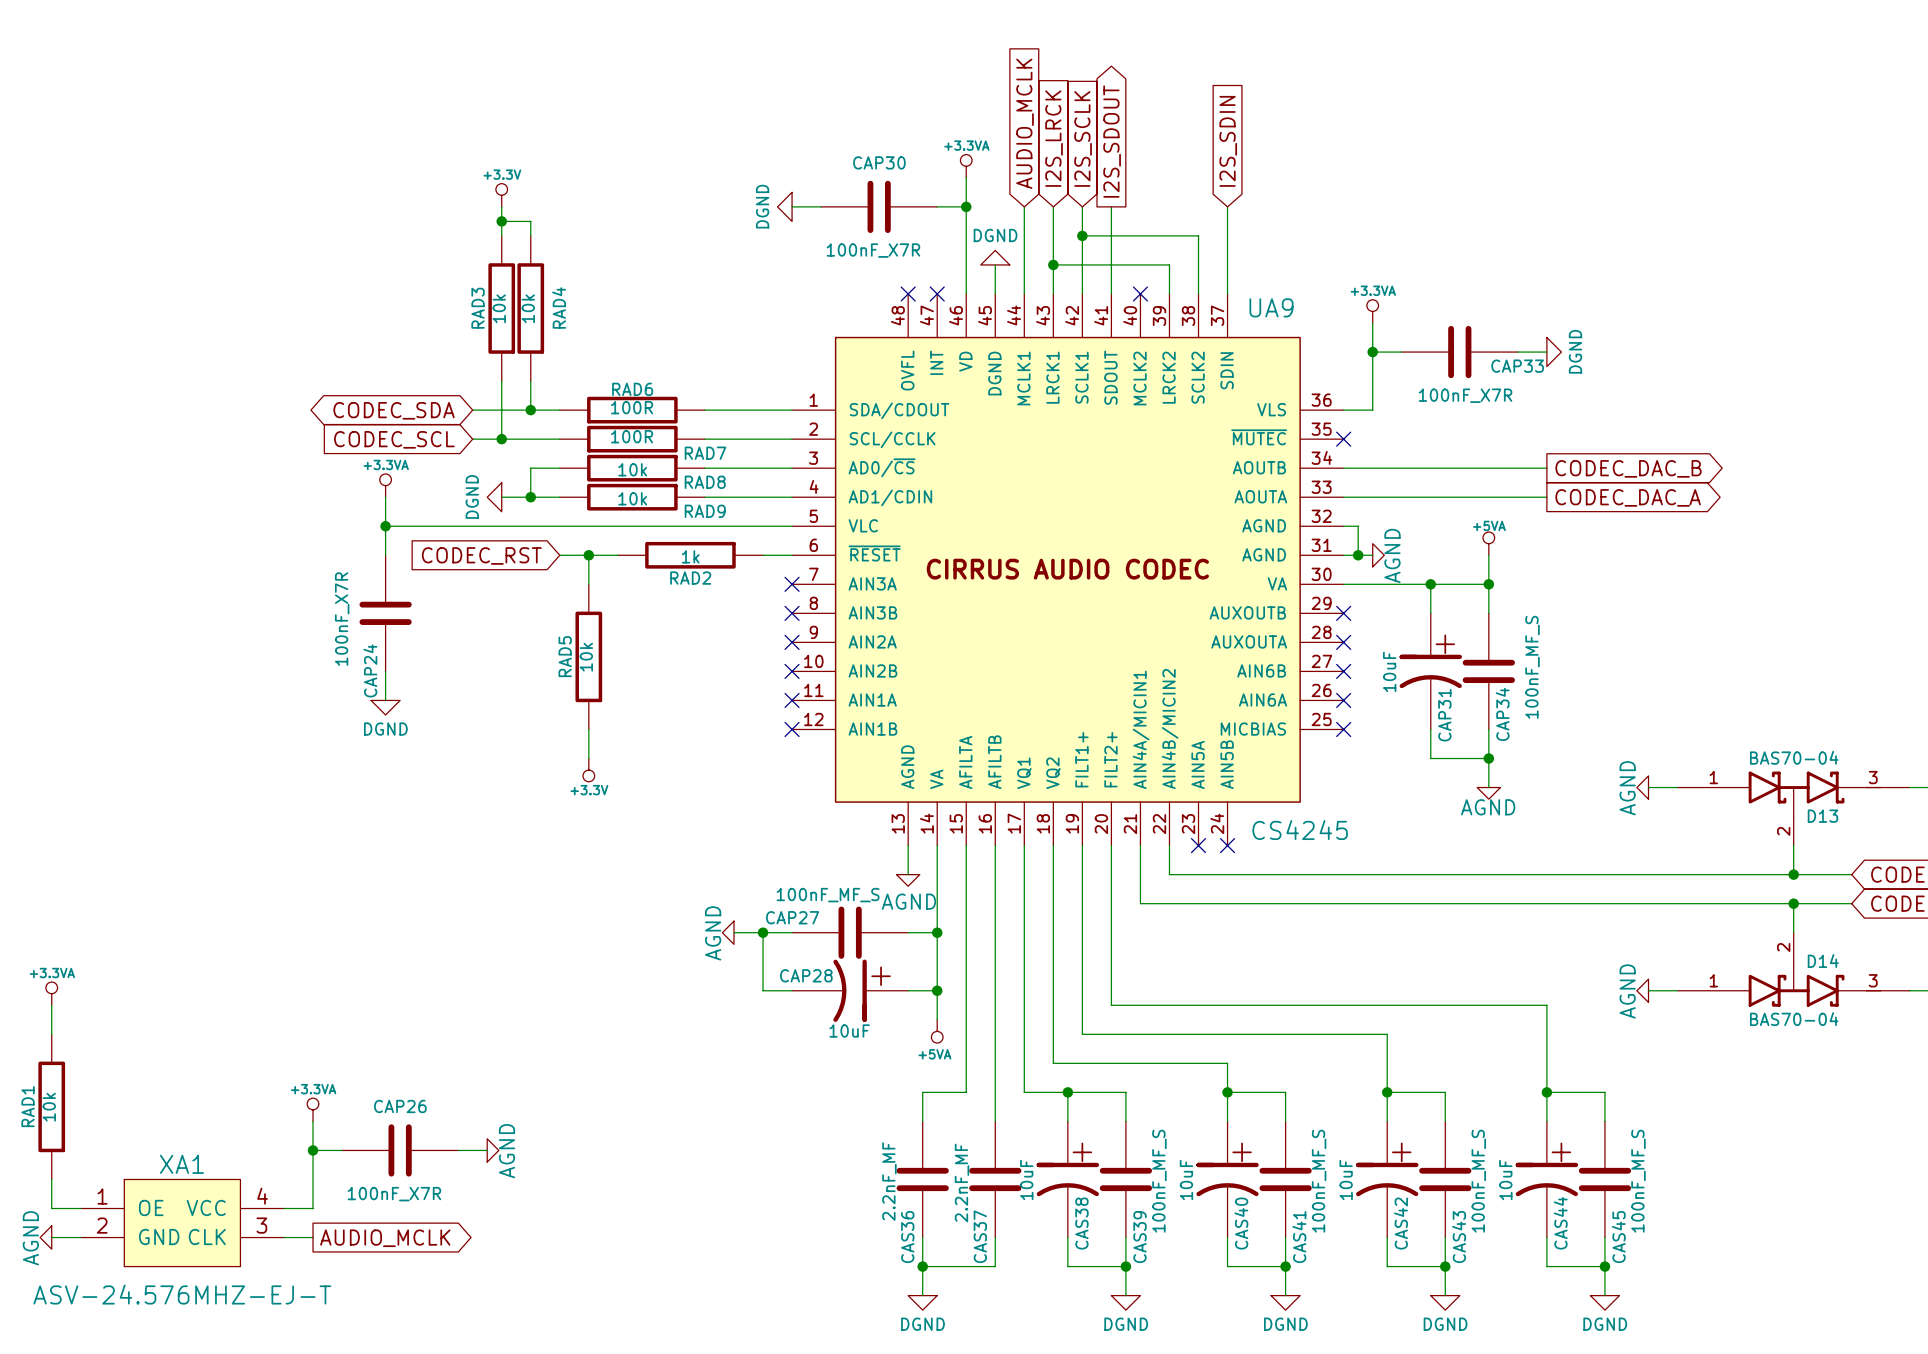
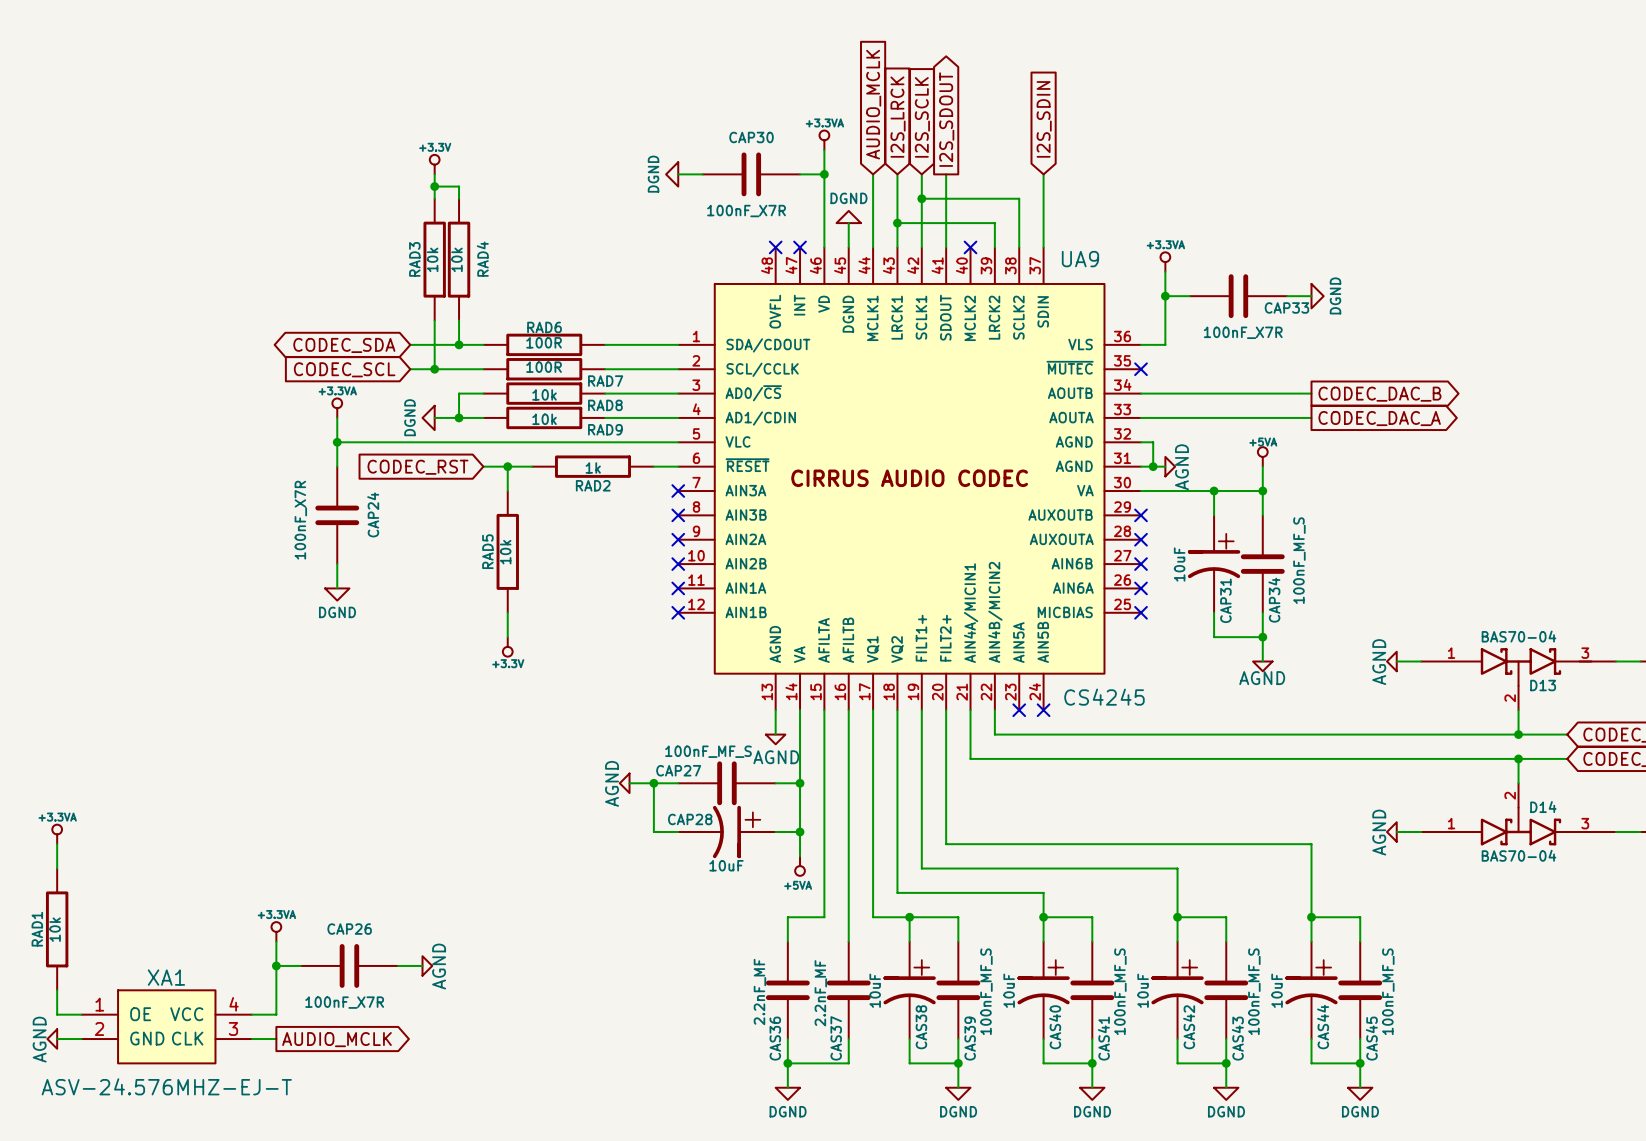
CAP24 name position: CAP24 (370, 670) -> CAP24 (373, 514)

